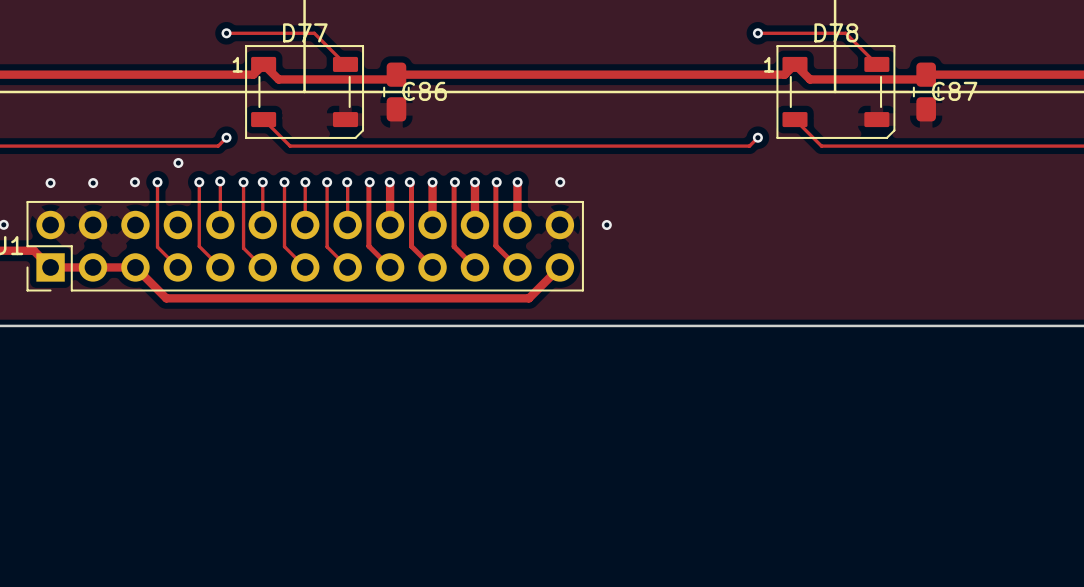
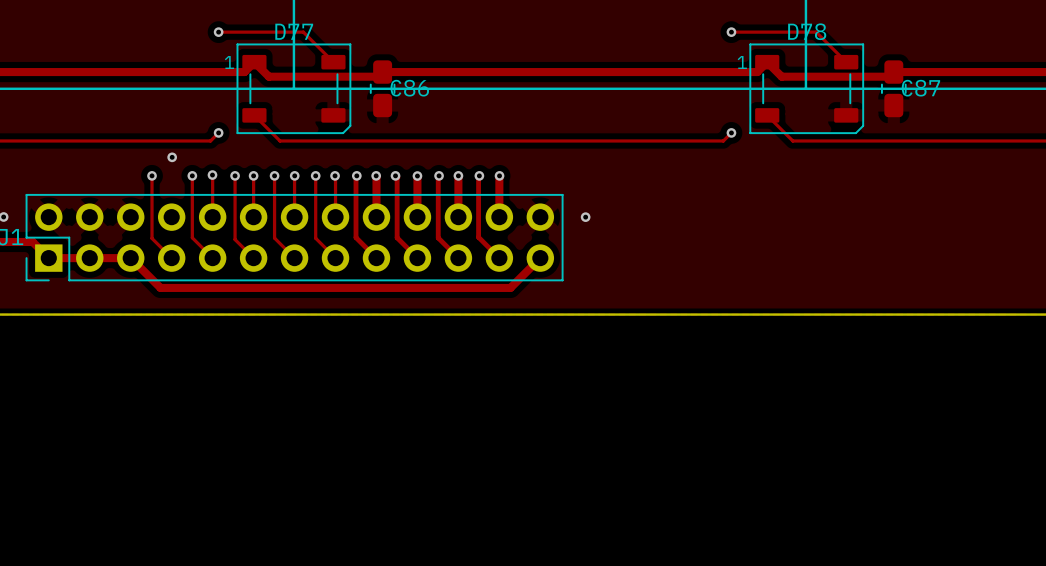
via: (134, 182) -> none
via: (560, 182) -> none
via: (50, 183) -> none
via: (93, 183) -> none

